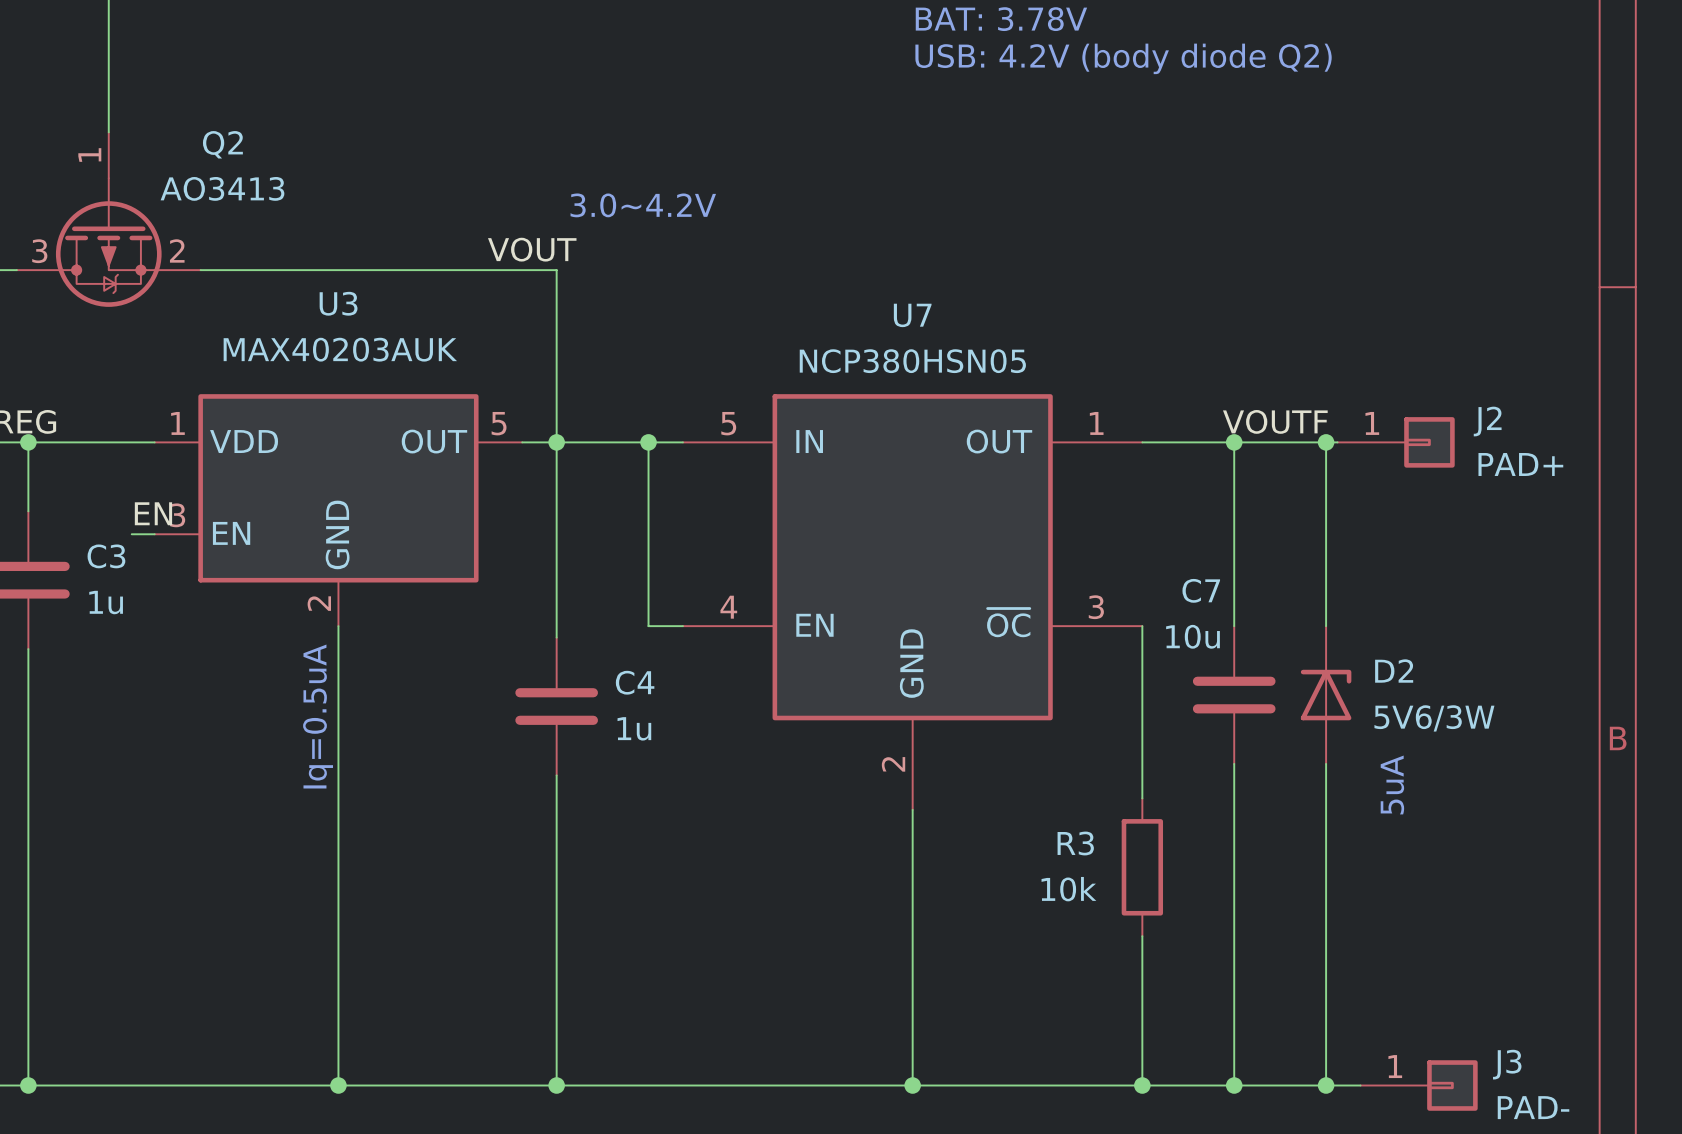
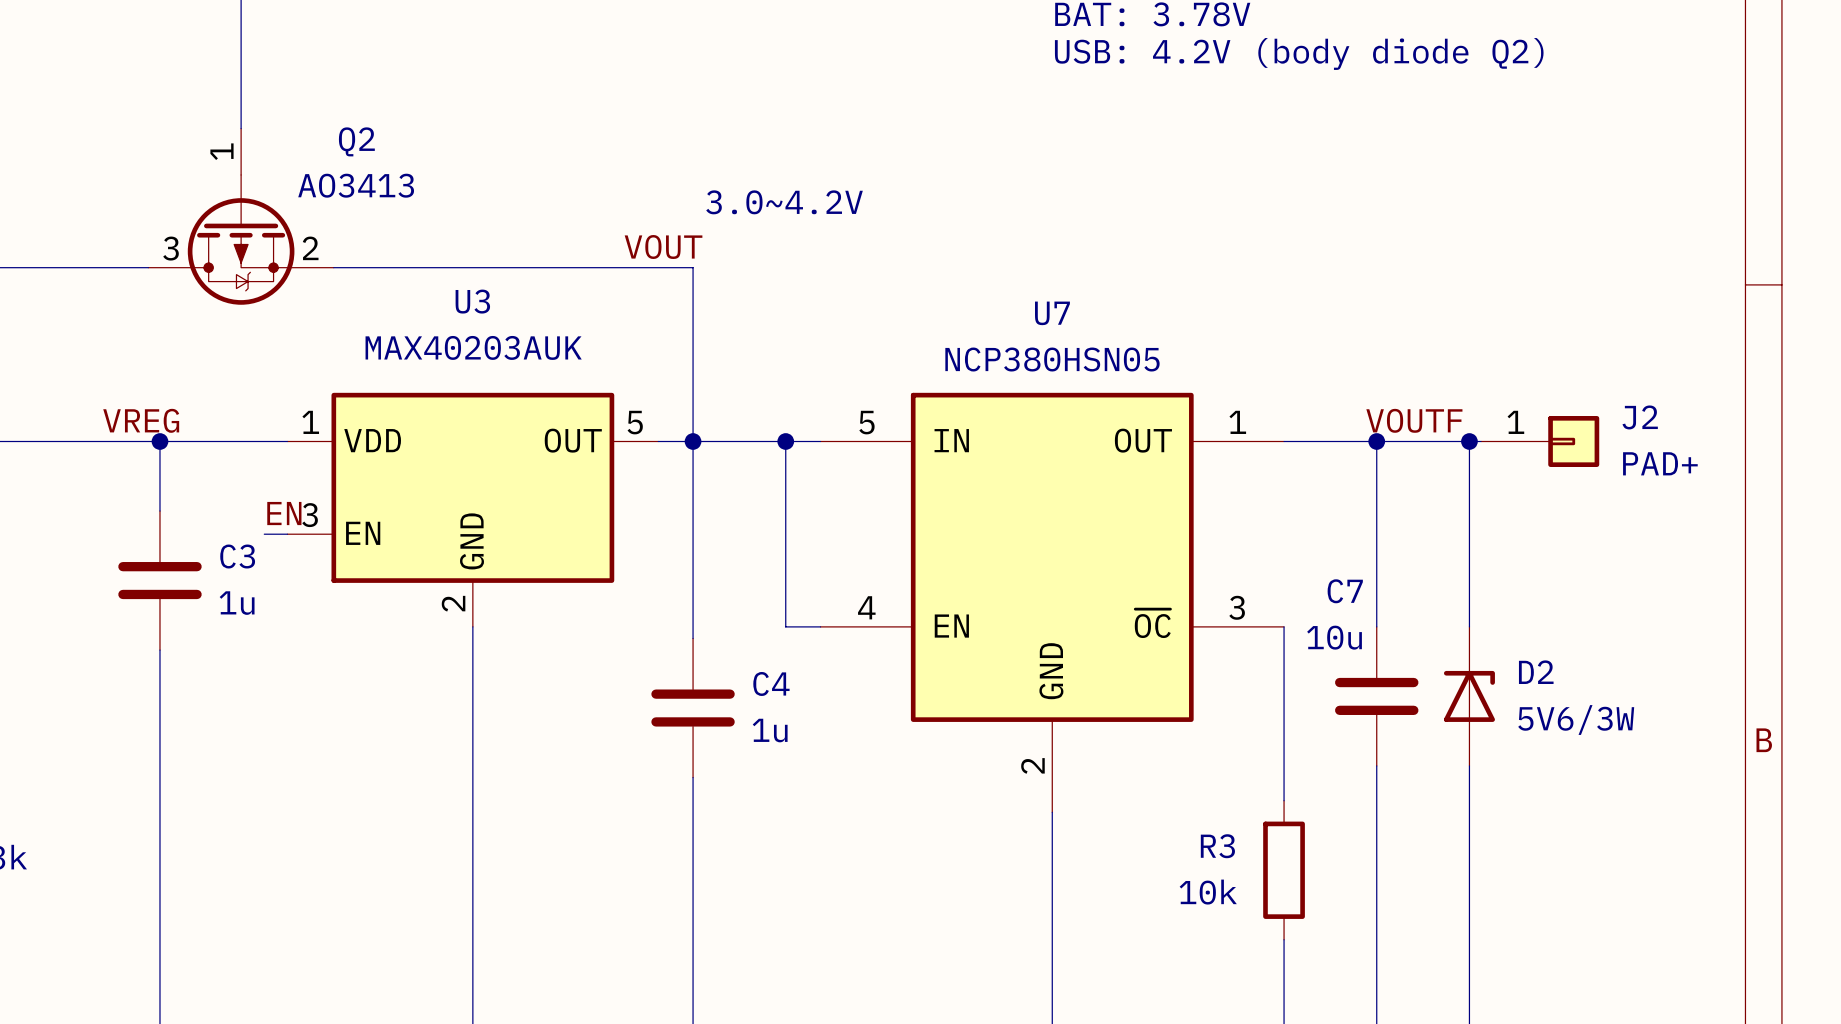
text: Iq=0.5uA (318, 716) -> none
text: 5uA (1392, 784) -> none

